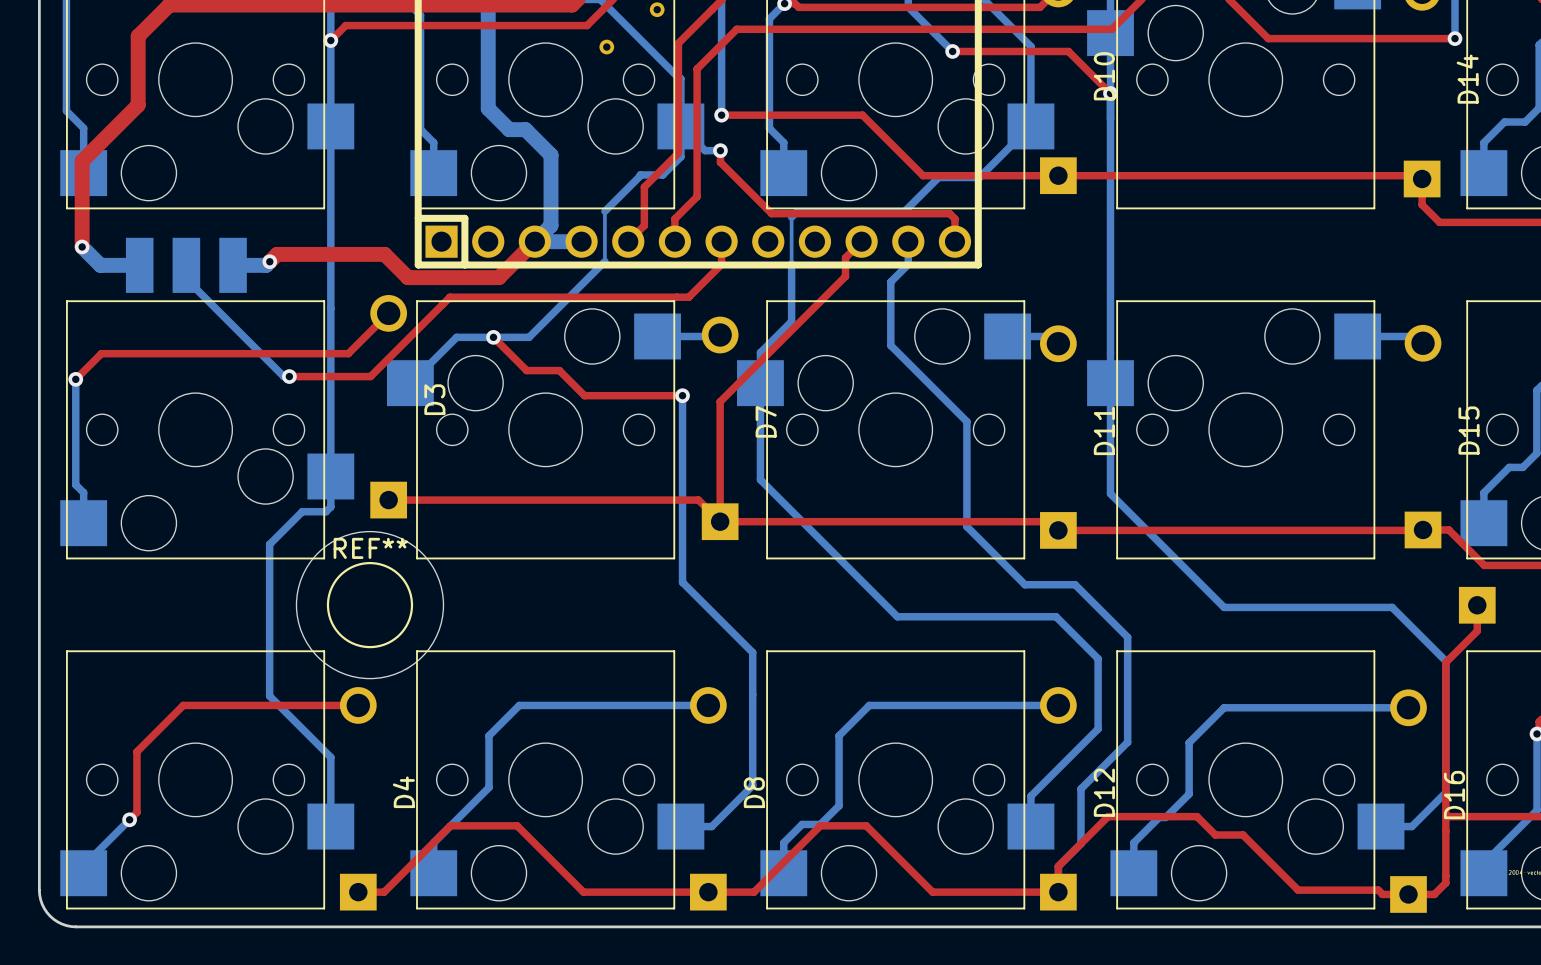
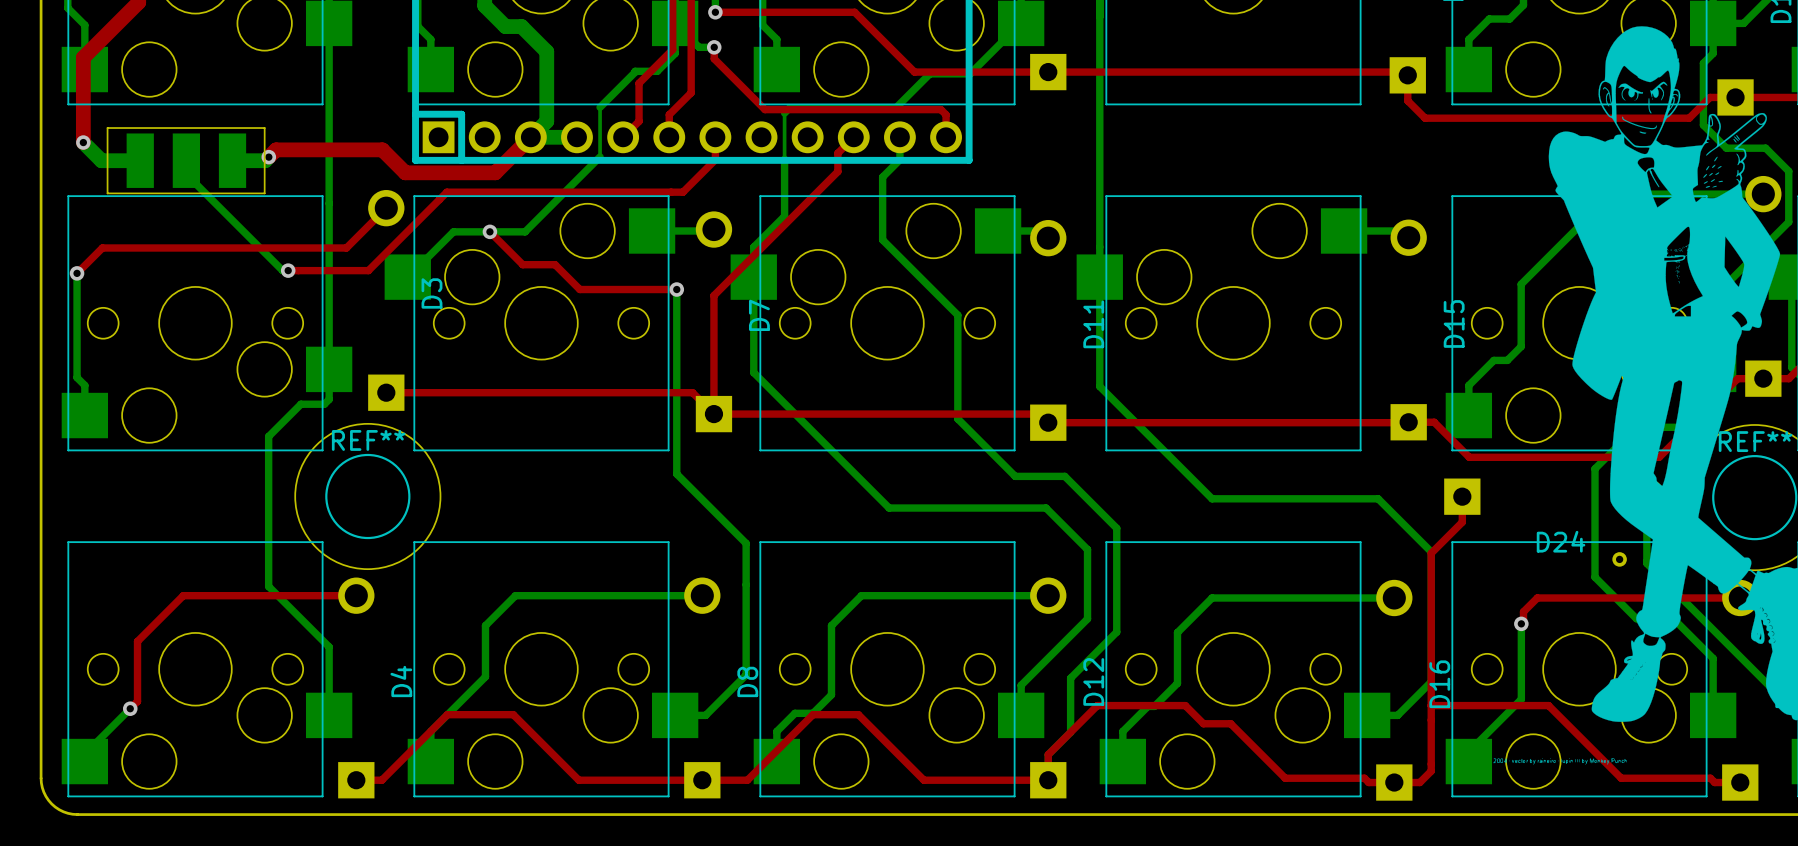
part footprint: [125, 237, 247, 293] -> [107, 127, 266, 194]

